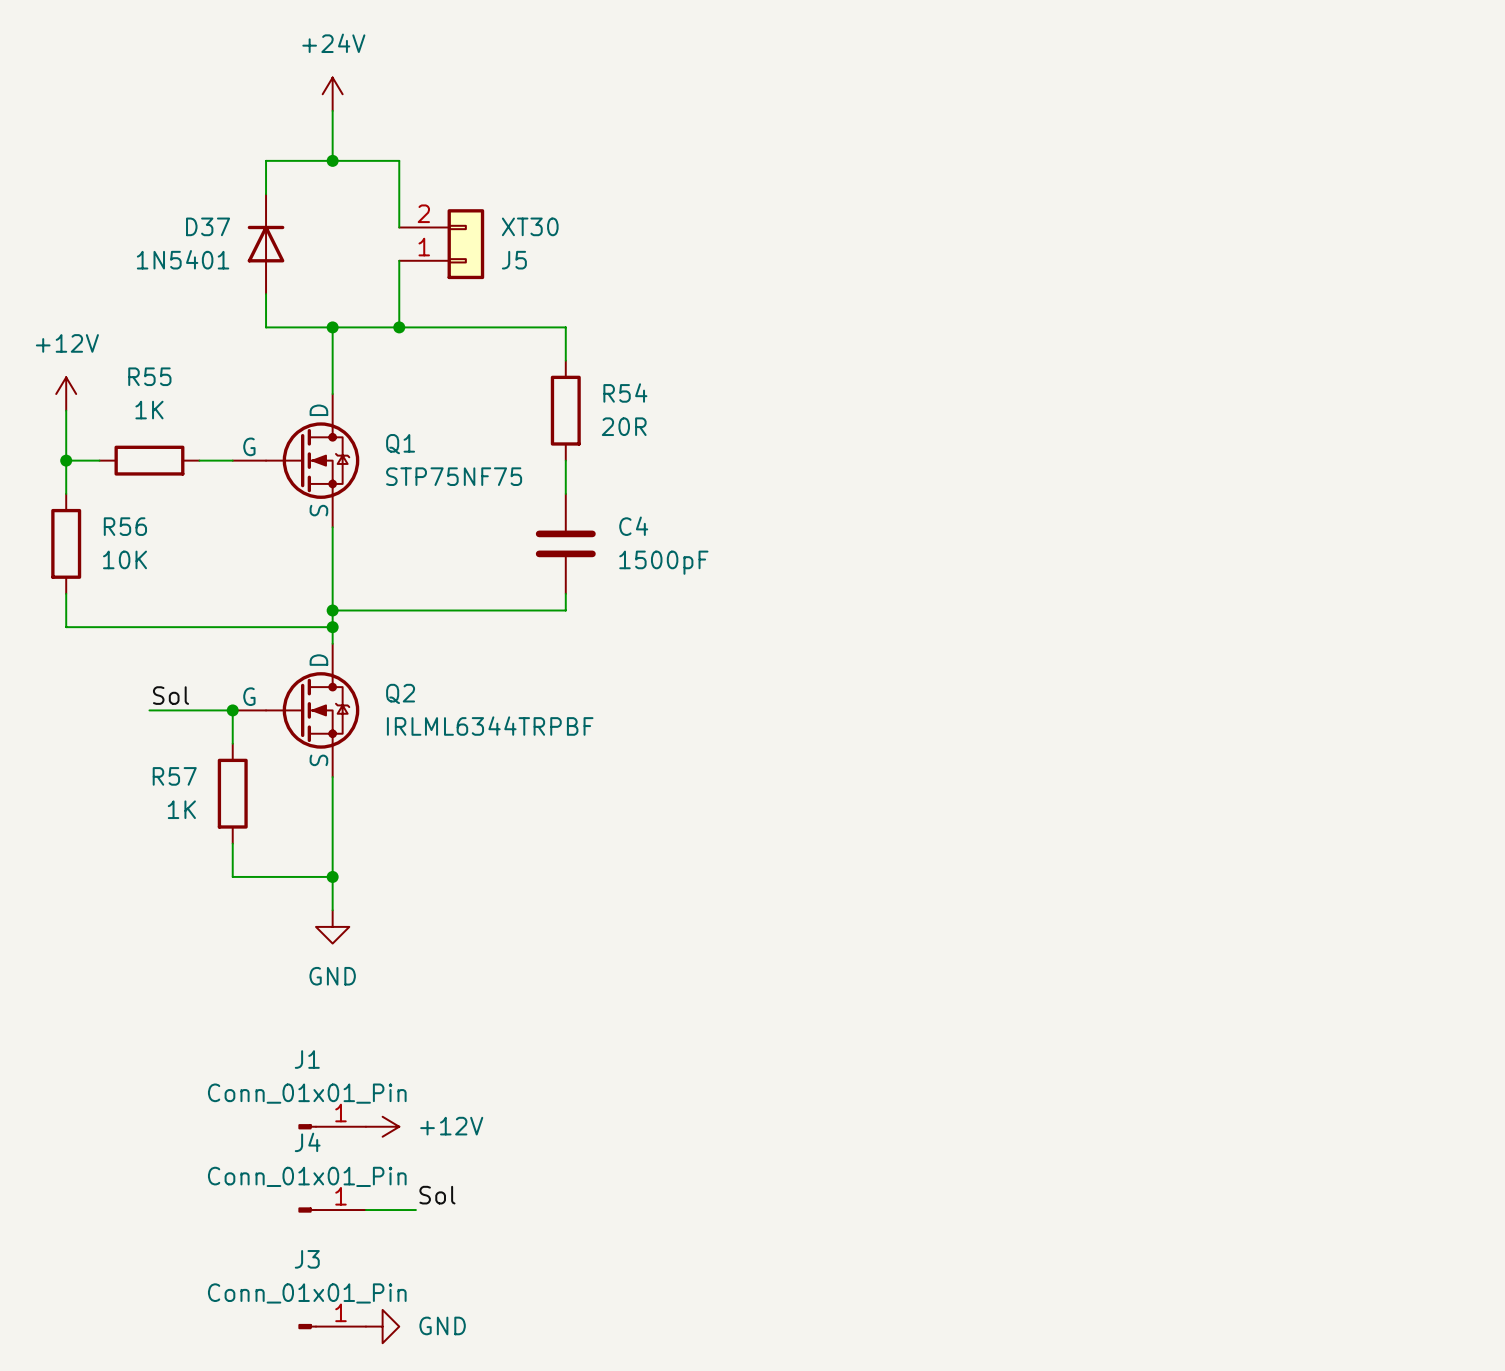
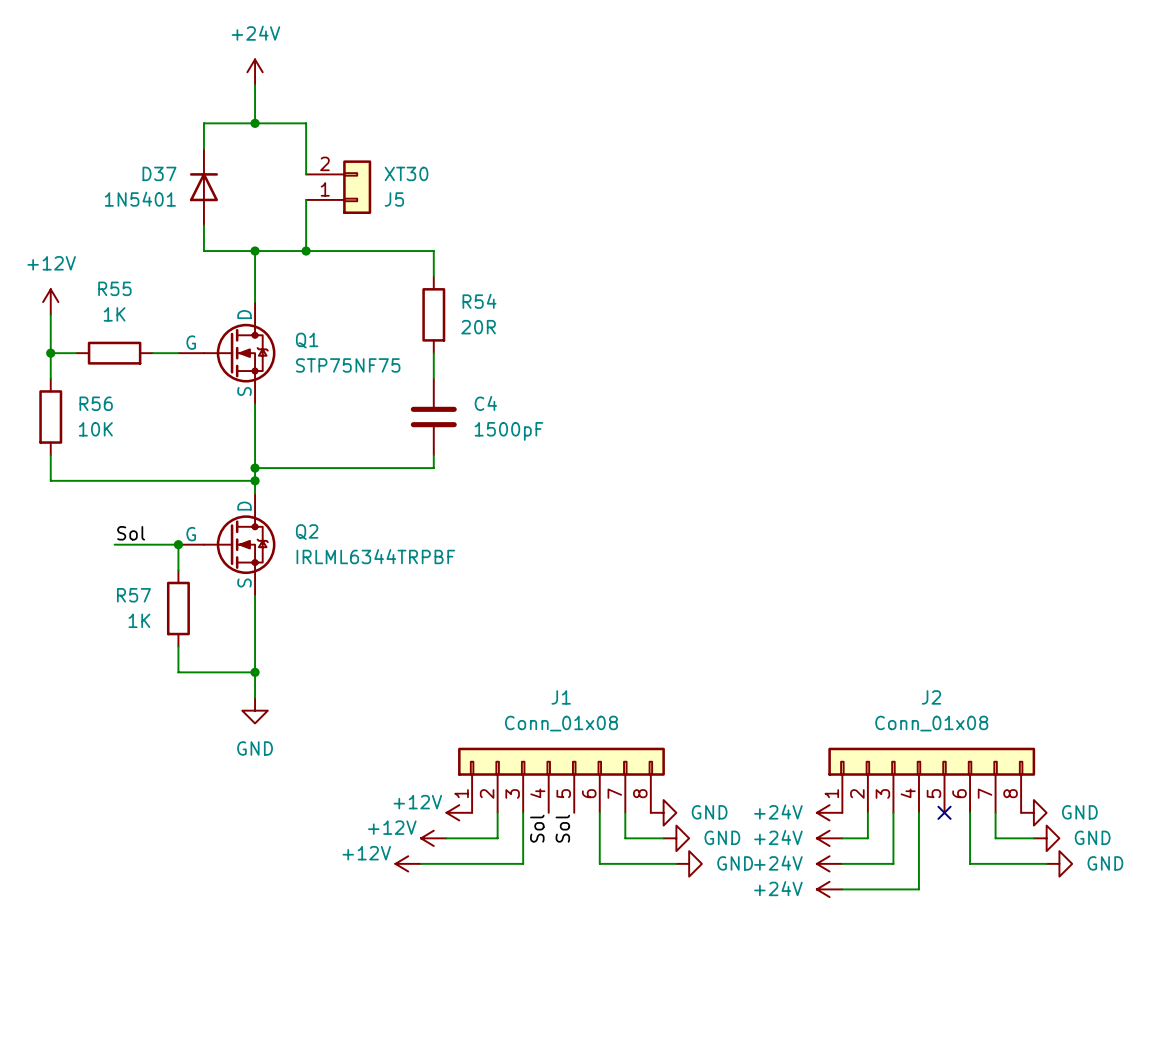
J2: none -> Conn_01x08 (931, 780)
J1 name position: J1 (307, 1059) -> J1 (561, 697)
power symbol: none -> +12V (459, 812)
wire: none -> (497, 812) (497, 838) (446, 838)
wire: none -> (523, 812) (523, 863) (421, 863)
wire: none -> (599, 812) (599, 863) (676, 863)
wire: none -> (625, 812) (625, 838) (663, 838)
power symbol: none -> GND (663, 812)
power symbol: none -> +24V (829, 812)
wire: none -> (867, 812) (867, 838) (842, 838)
wire: none -> (893, 812) (893, 863) (842, 863)
wire: none -> (918, 812) (918, 889) (842, 889)
no-connect mark: none -> (944, 812)
wire: none -> (970, 812) (970, 863) (1046, 863)
wire: none -> (995, 812) (995, 838) (1033, 838)
power symbol: none -> GND (1033, 812)
label: none -> Sol (537, 828)
label: none -> Sol (562, 828)
J1 value: Conn_01x01_Pin (307, 1093) -> Conn_01x08 (561, 723)
power symbol: none -> +12V (433, 838)
power symbol: none -> GND (676, 838)
power symbol: none -> +24V (829, 838)
power symbol: none -> GND (1046, 838)
J1 symbol: [298, 1124, 366, 1130] -> [458, 747, 665, 813]
power symbol: +12V (382, 1126) -> none
power symbol: none -> +12V (408, 863)
power symbol: none -> GND (689, 863)
power symbol: none -> +24V (829, 863)
power symbol: none -> GND (1059, 863)
power symbol: none -> +24V (829, 889)
label: Sol (437, 1195) -> none
J4: Conn_01x01_Pin (332, 1210) -> none
wire: (365, 1210) (415, 1210) -> none
J3: Conn_01x01_Pin (332, 1326) -> none
power symbol: GND (382, 1326) -> none

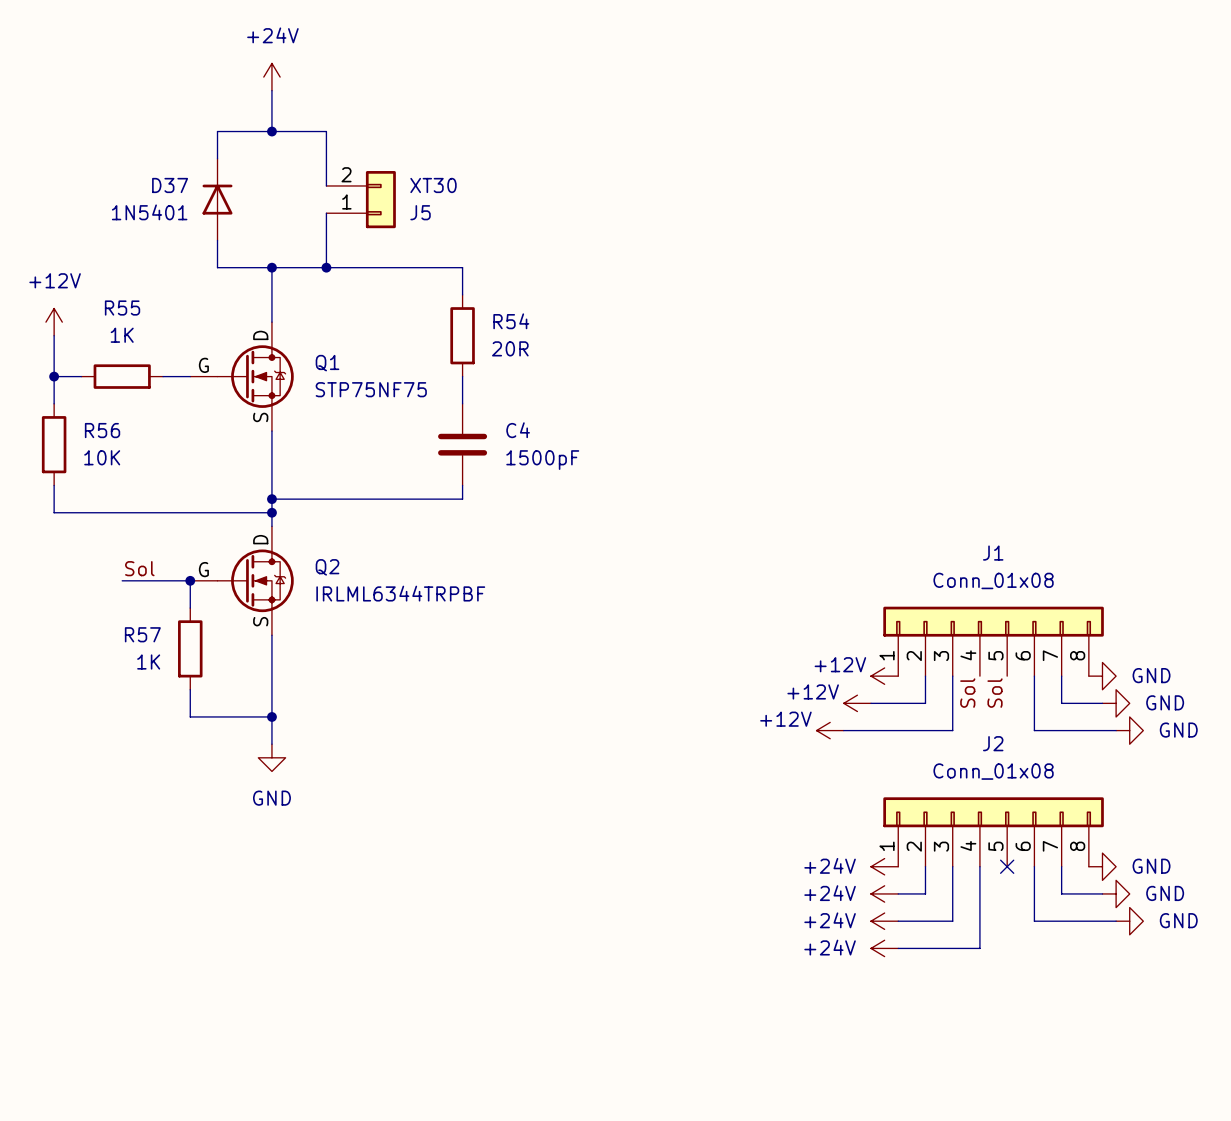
power symbol: none -> +12V (884, 676)
wire: none -> (925, 676) (925, 703) (871, 703)
wire: none -> (952, 676) (952, 730) (843, 730)
wire: none -> (1034, 676) (1034, 730) (1116, 730)
wire: none -> (1061, 676) (1061, 703) (1102, 703)
power symbol: none -> GND (1102, 676)
label: none -> Sol (967, 693)
label: none -> Sol (995, 693)
power symbol: none -> +12V (857, 703)
power symbol: none -> GND (1116, 703)
power symbol: none -> +12V (830, 730)
power symbol: none -> GND (1129, 730)
J1 position: (561, 780) -> (993, 641)
power symbol: +12V (459, 812) -> none
wire: (497, 812) (497, 838) (446, 838) -> none
wire: (523, 812) (523, 863) (421, 863) -> none
wire: (599, 812) (599, 863) (676, 863) -> none
wire: (625, 812) (625, 838) (663, 838) -> none
power symbol: GND (663, 812) -> none
label: Sol (537, 828) -> none
label: Sol (562, 828) -> none
power symbol: +12V (433, 838) -> none
power symbol: GND (676, 838) -> none
power symbol: +12V (408, 863) -> none
power symbol: GND (689, 863) -> none

